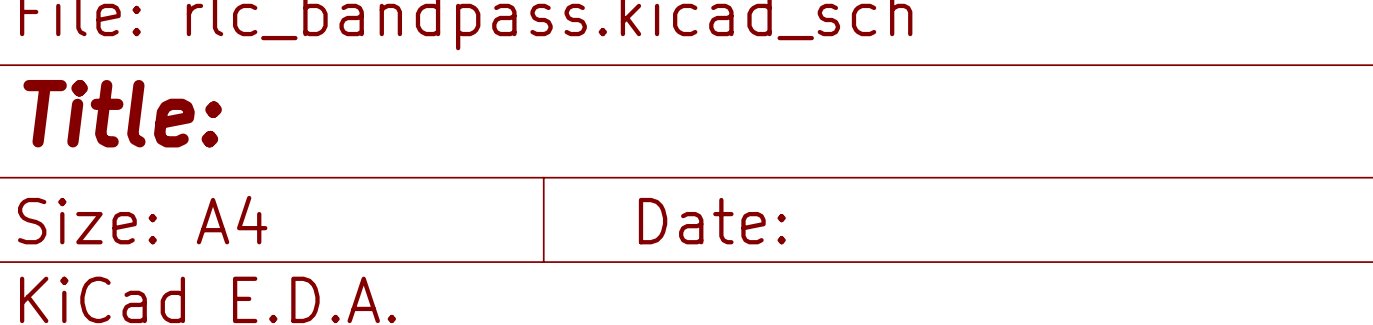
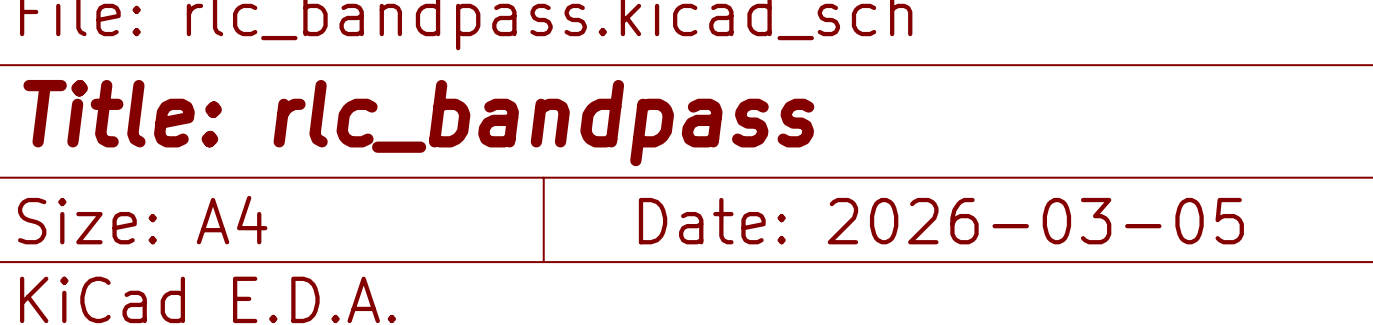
title block: Title: (122, 113) -> Title: rlc_bandpass (418, 123)
title block: Date: (712, 221) -> Date: 2026-03-05 (941, 221)

